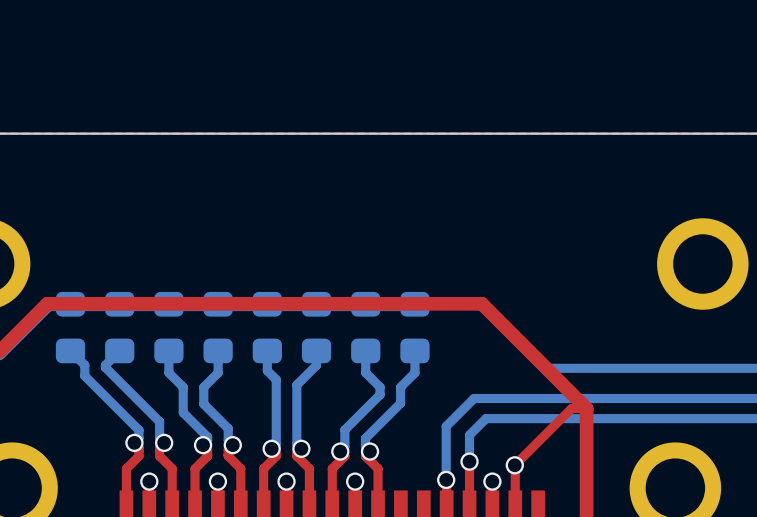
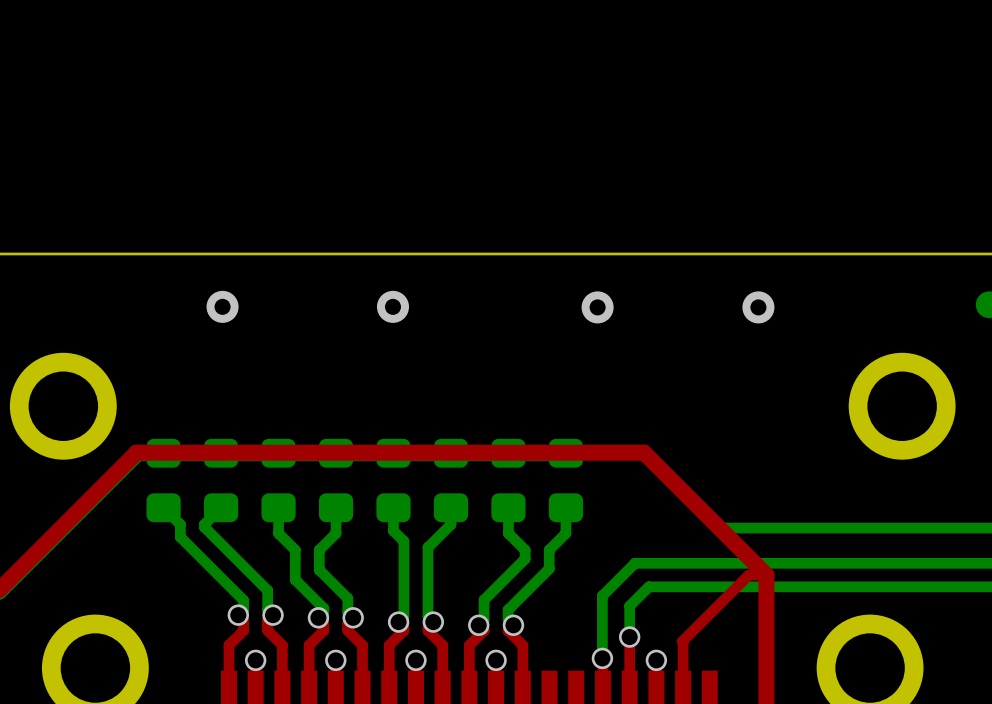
via: none -> (222, 306)
via: none -> (392, 306)
via: none -> (597, 307)
via: none -> (758, 307)
via: (514, 465) -> none

